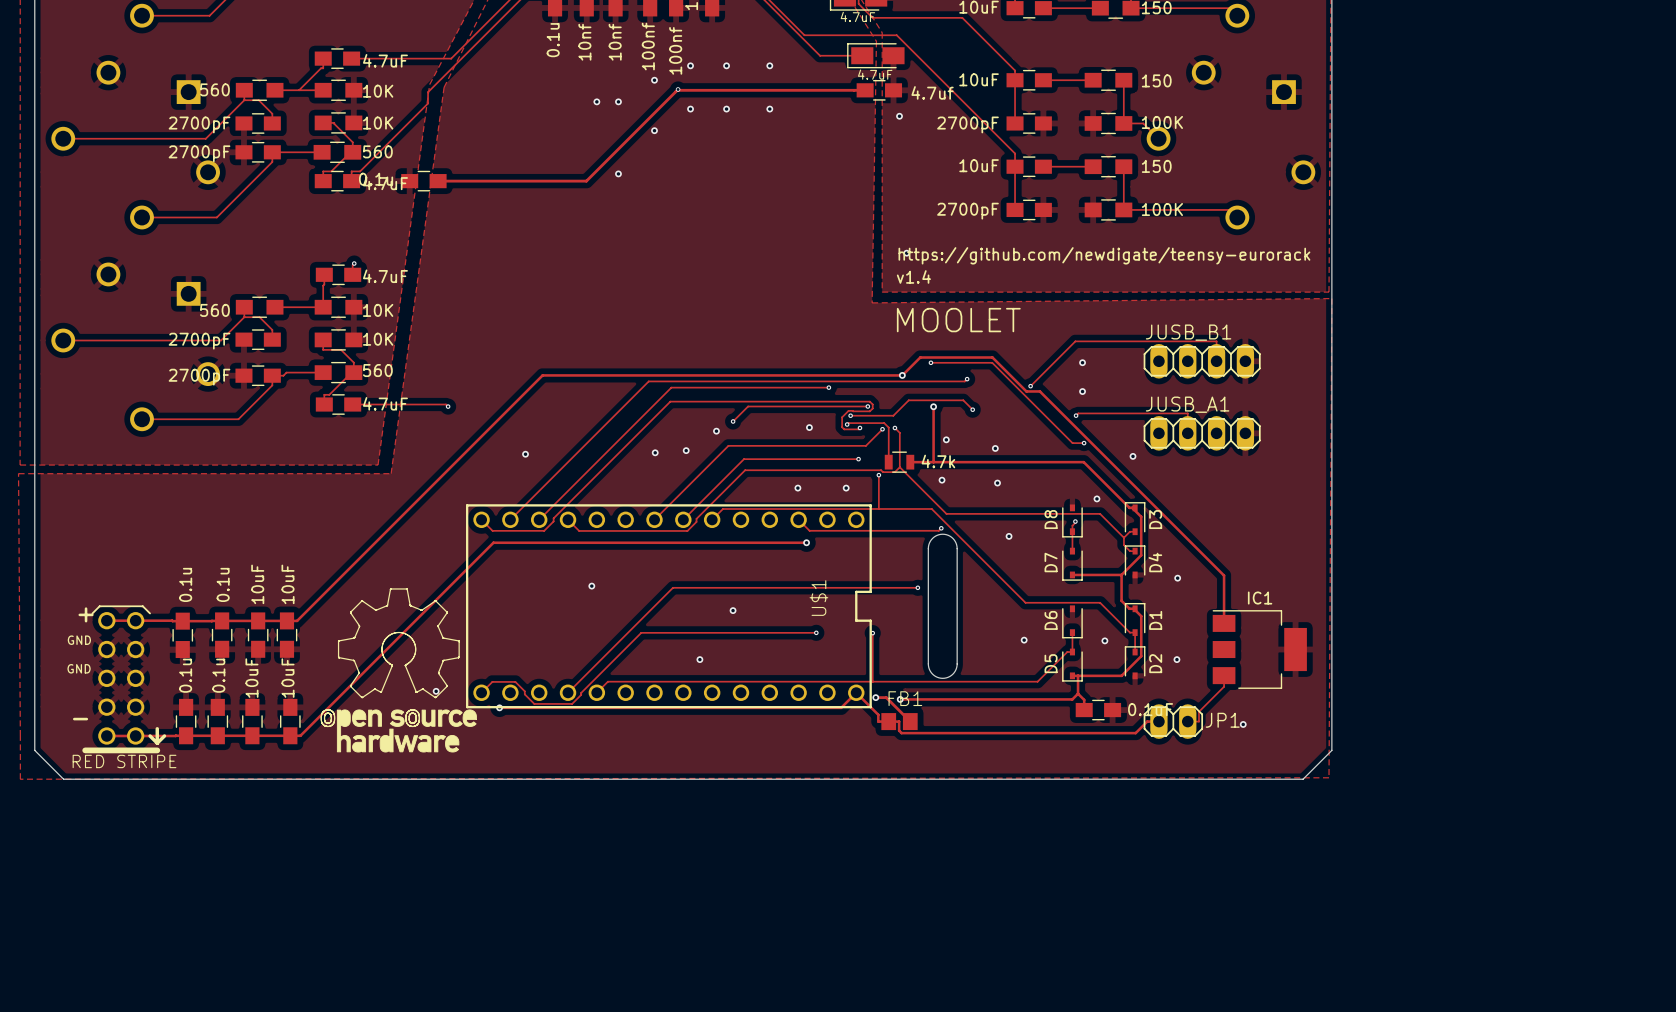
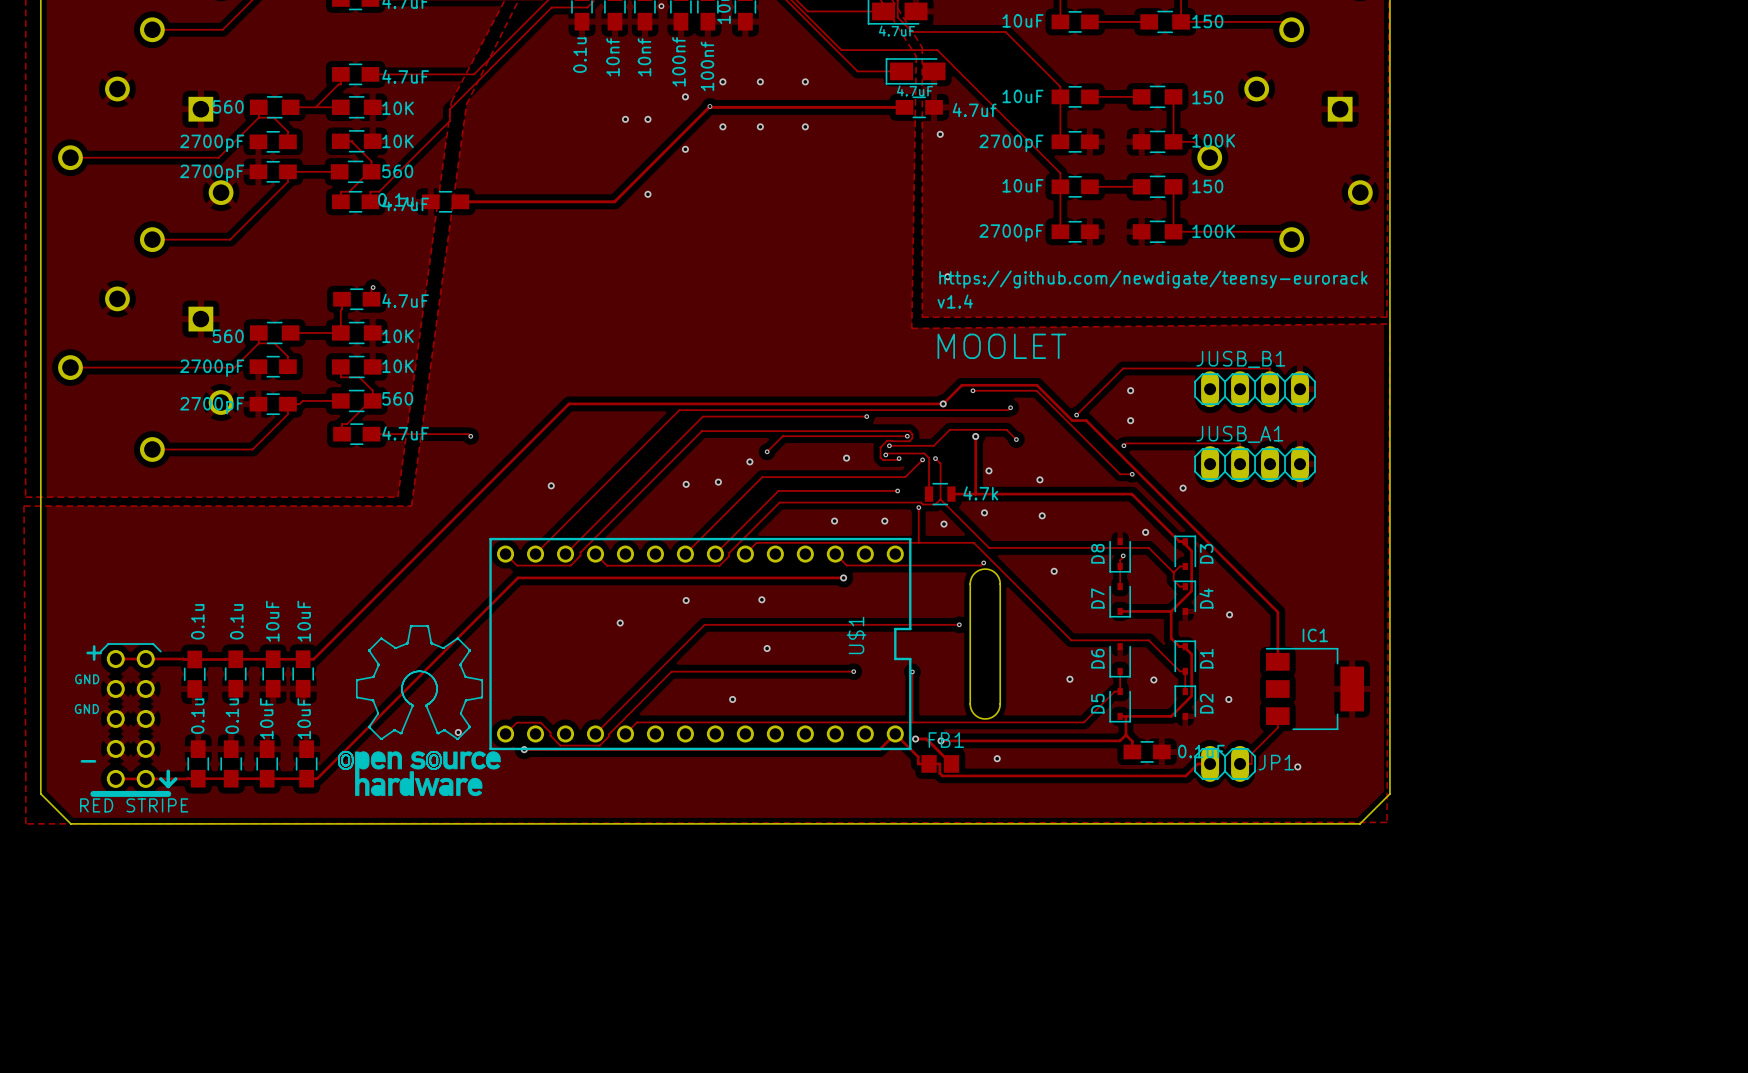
via: none -> (944, 524)
via: none -> (761, 599)
via: none -> (686, 600)
via: none -> (997, 758)

